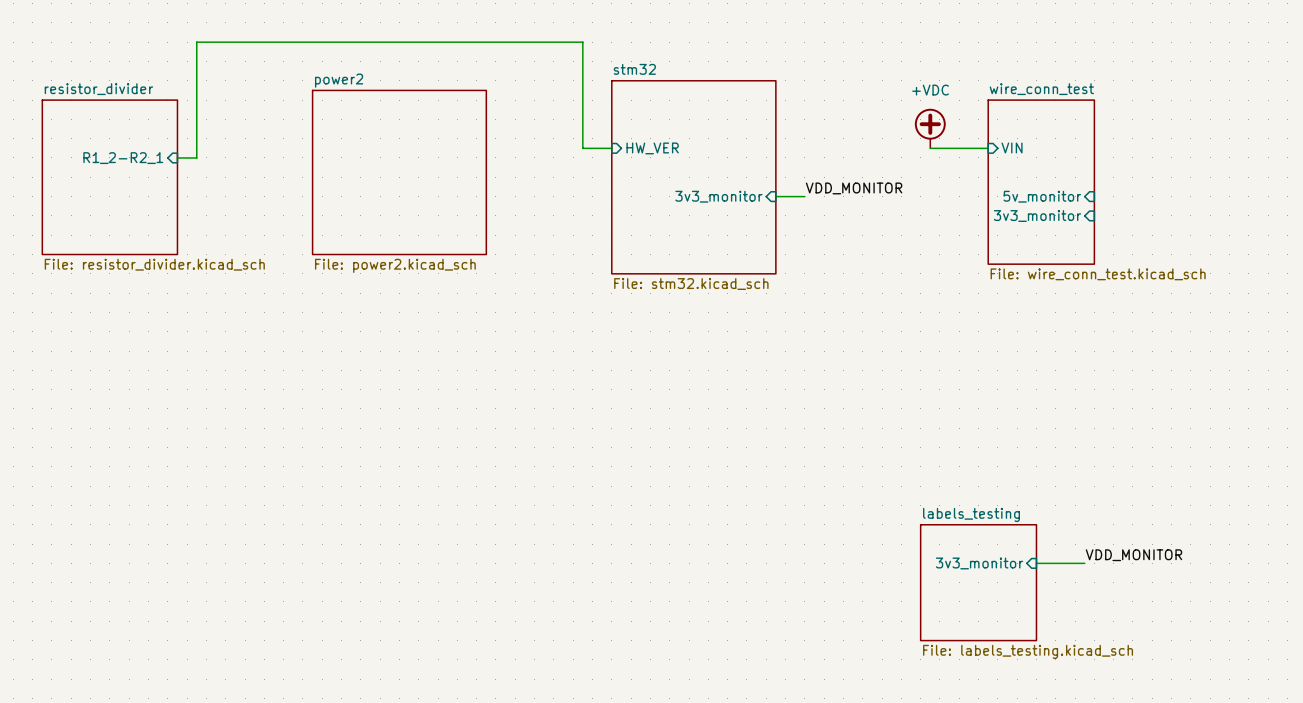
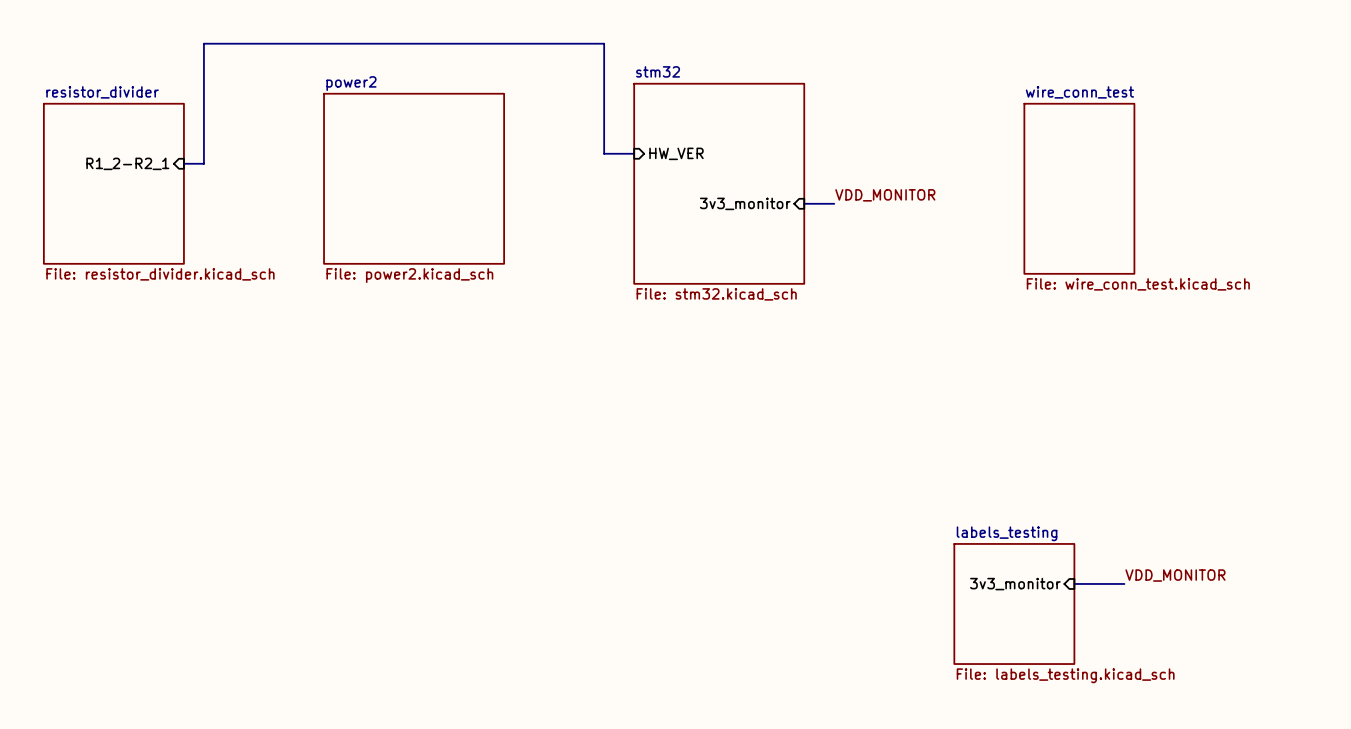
power symbol: +VDC (930, 128) -> none
sheet pin: VIN (1012, 147) -> none
wire: (930, 148) (988, 148) -> none
sheet pin: 5v_monitor (1042, 196) -> none
sheet pin: 3v3_monitor (1037, 216) -> none

